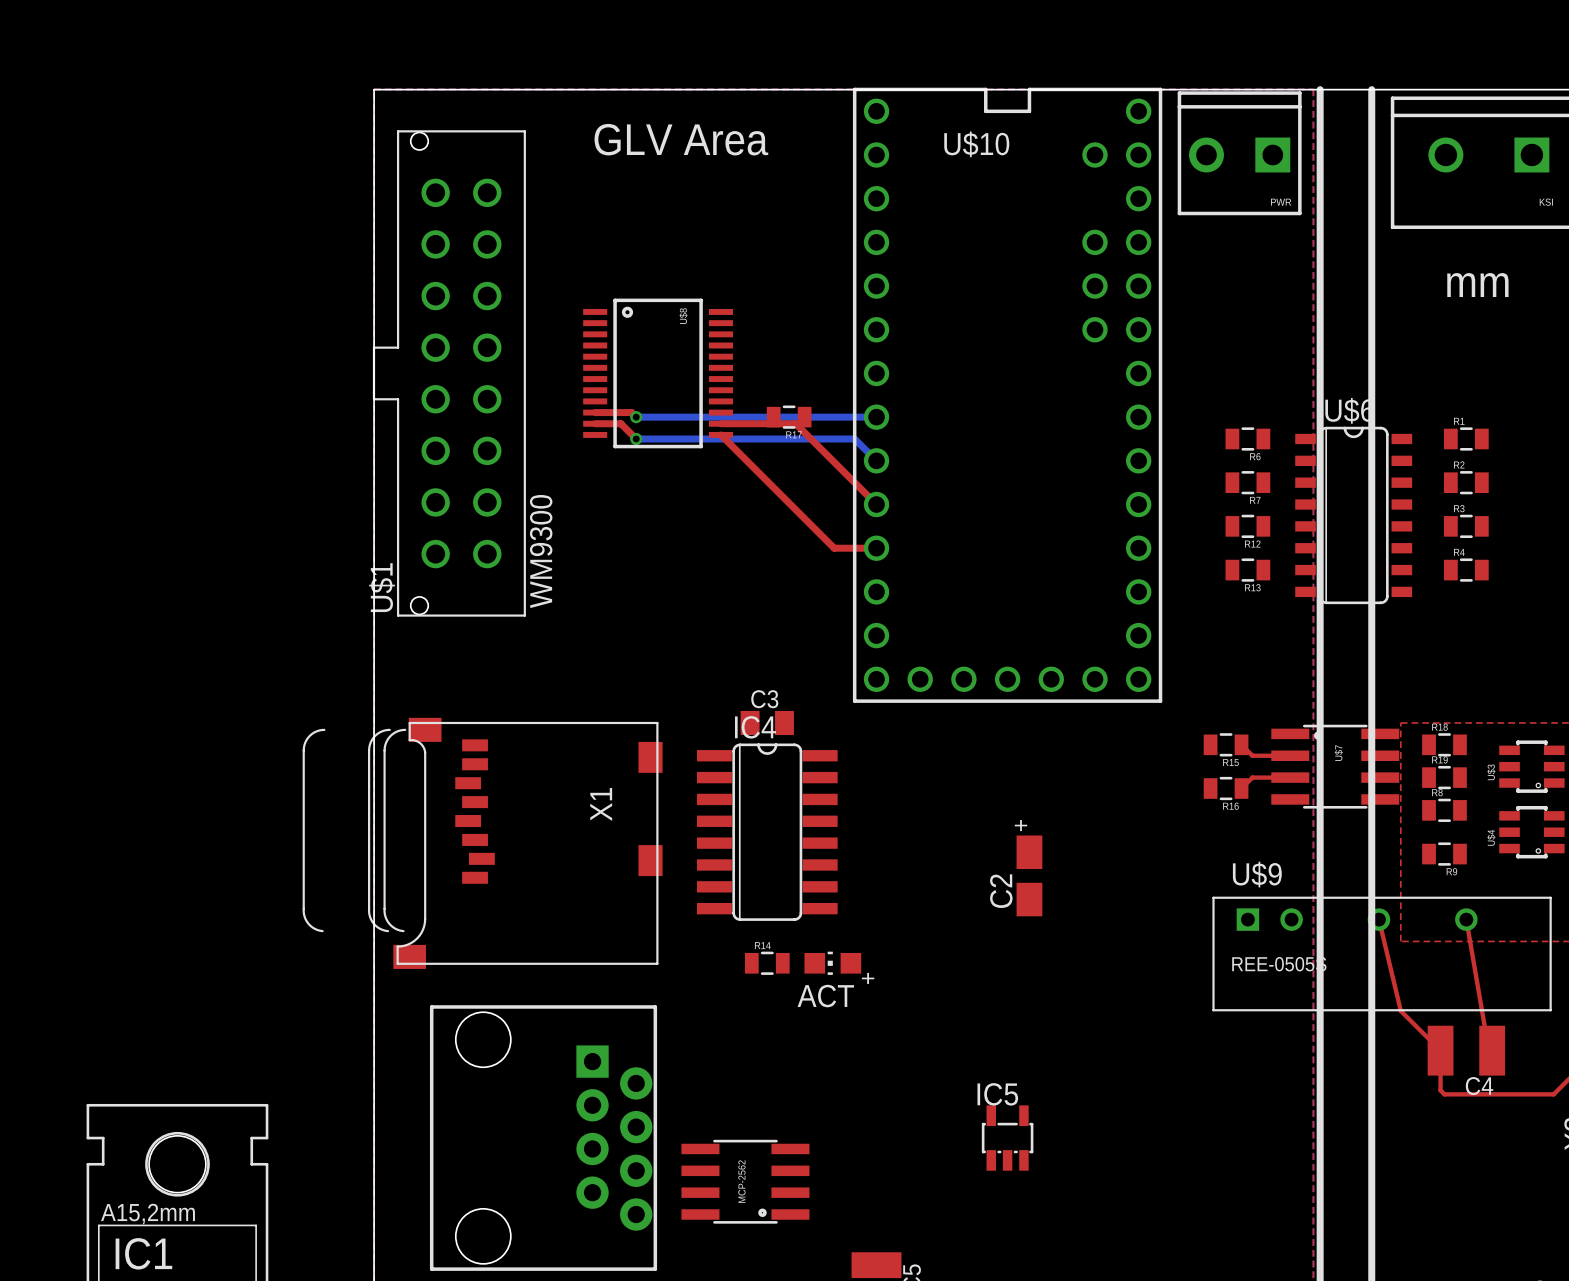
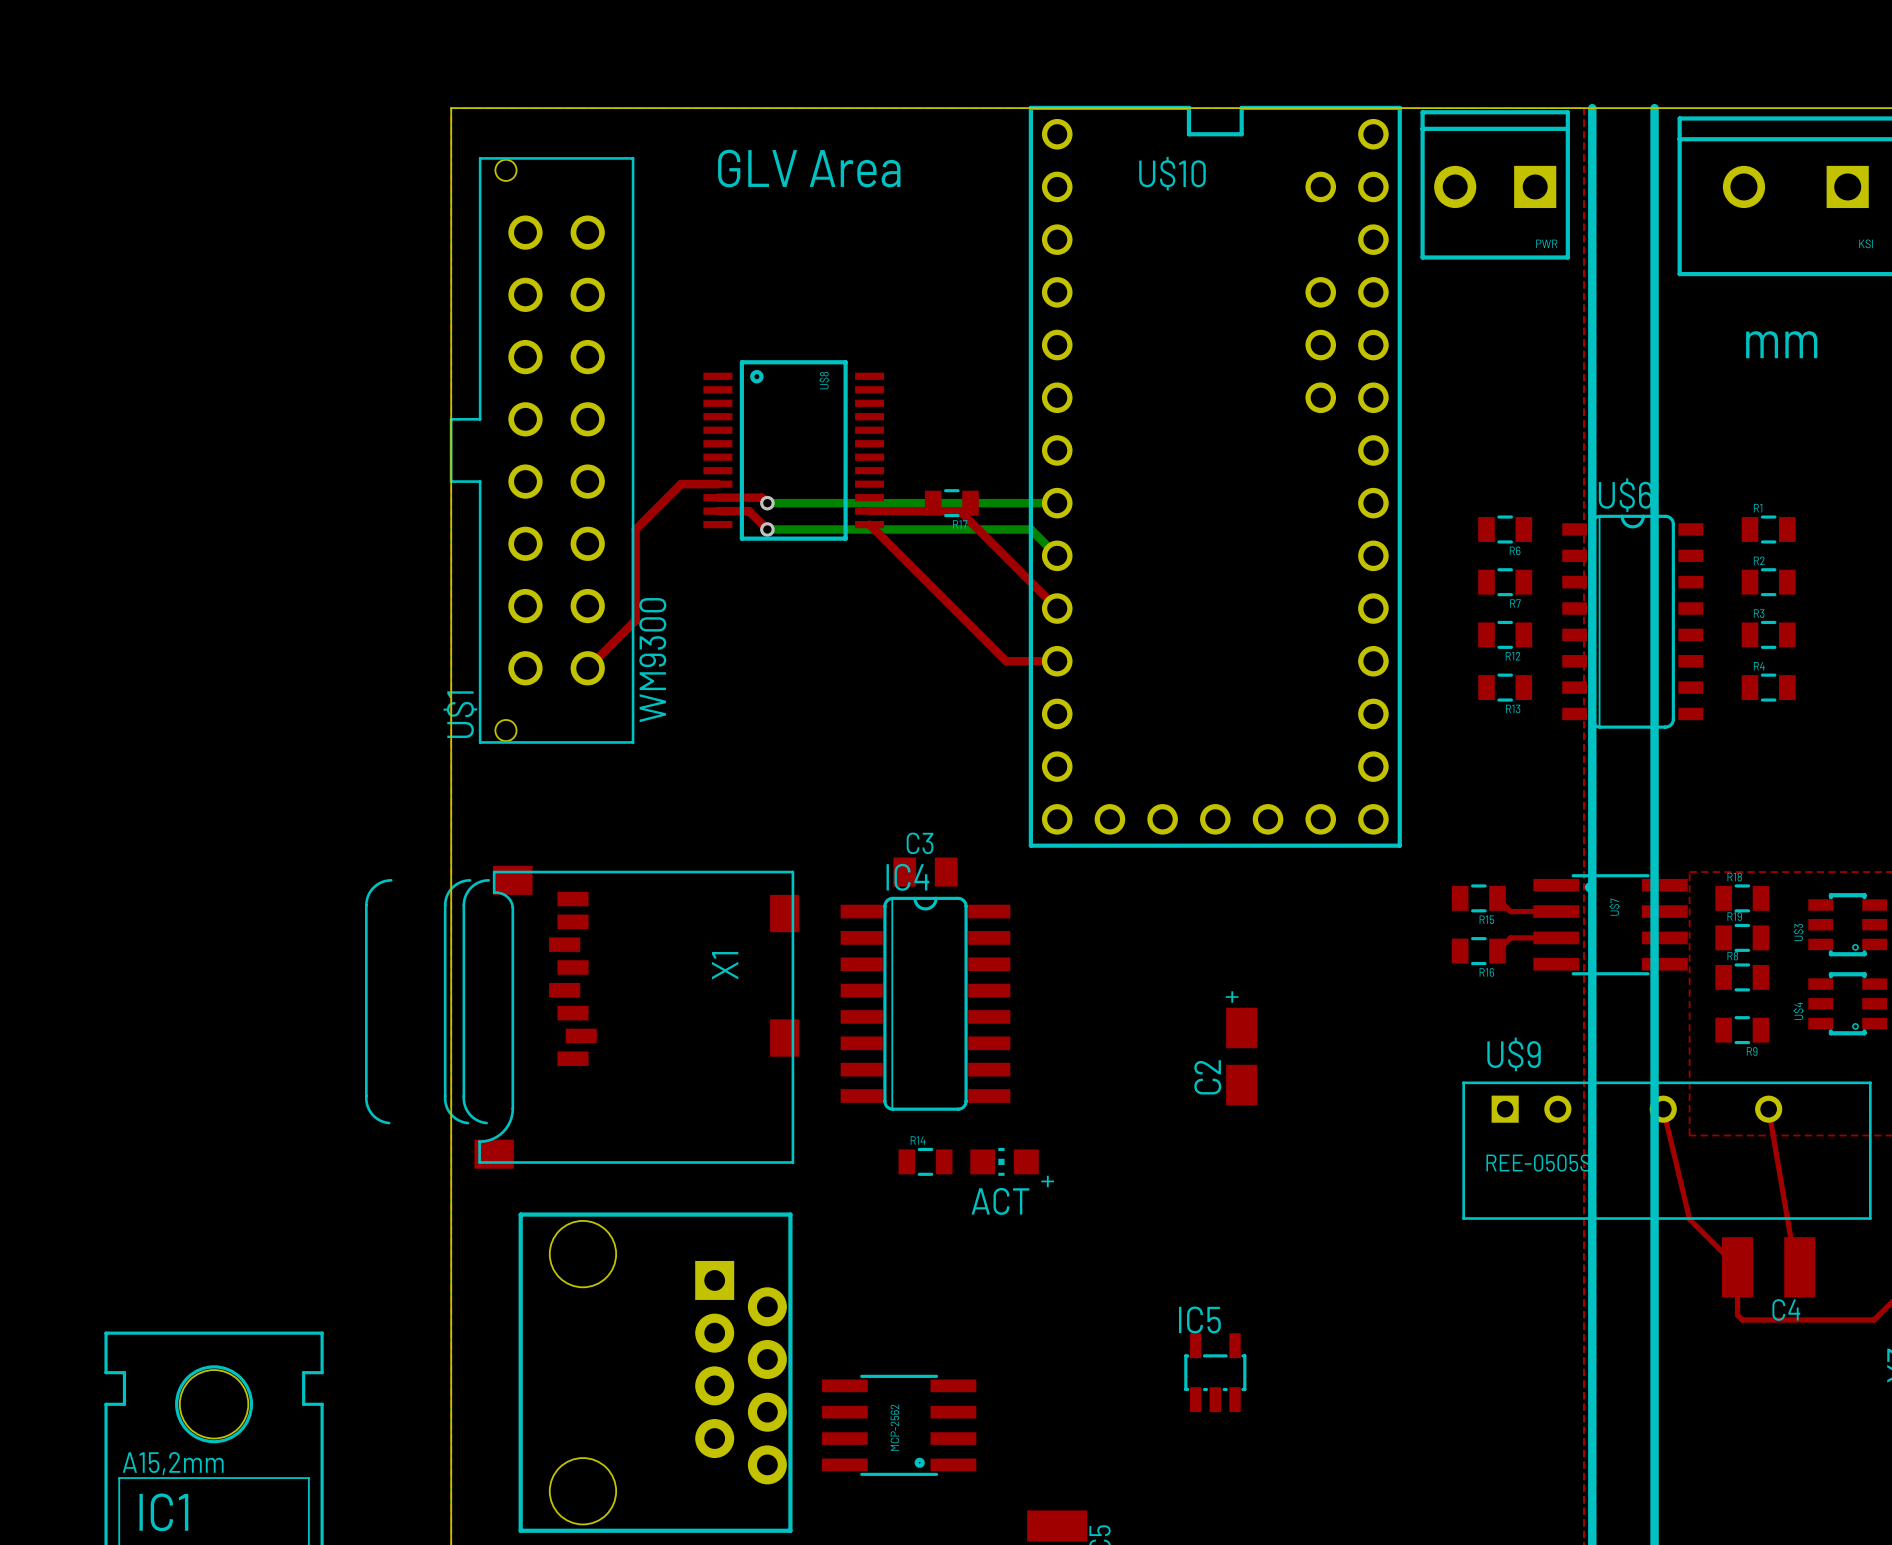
top track: none -> (717, 484) (680, 484) (635, 529) (635, 620) (587, 668)

